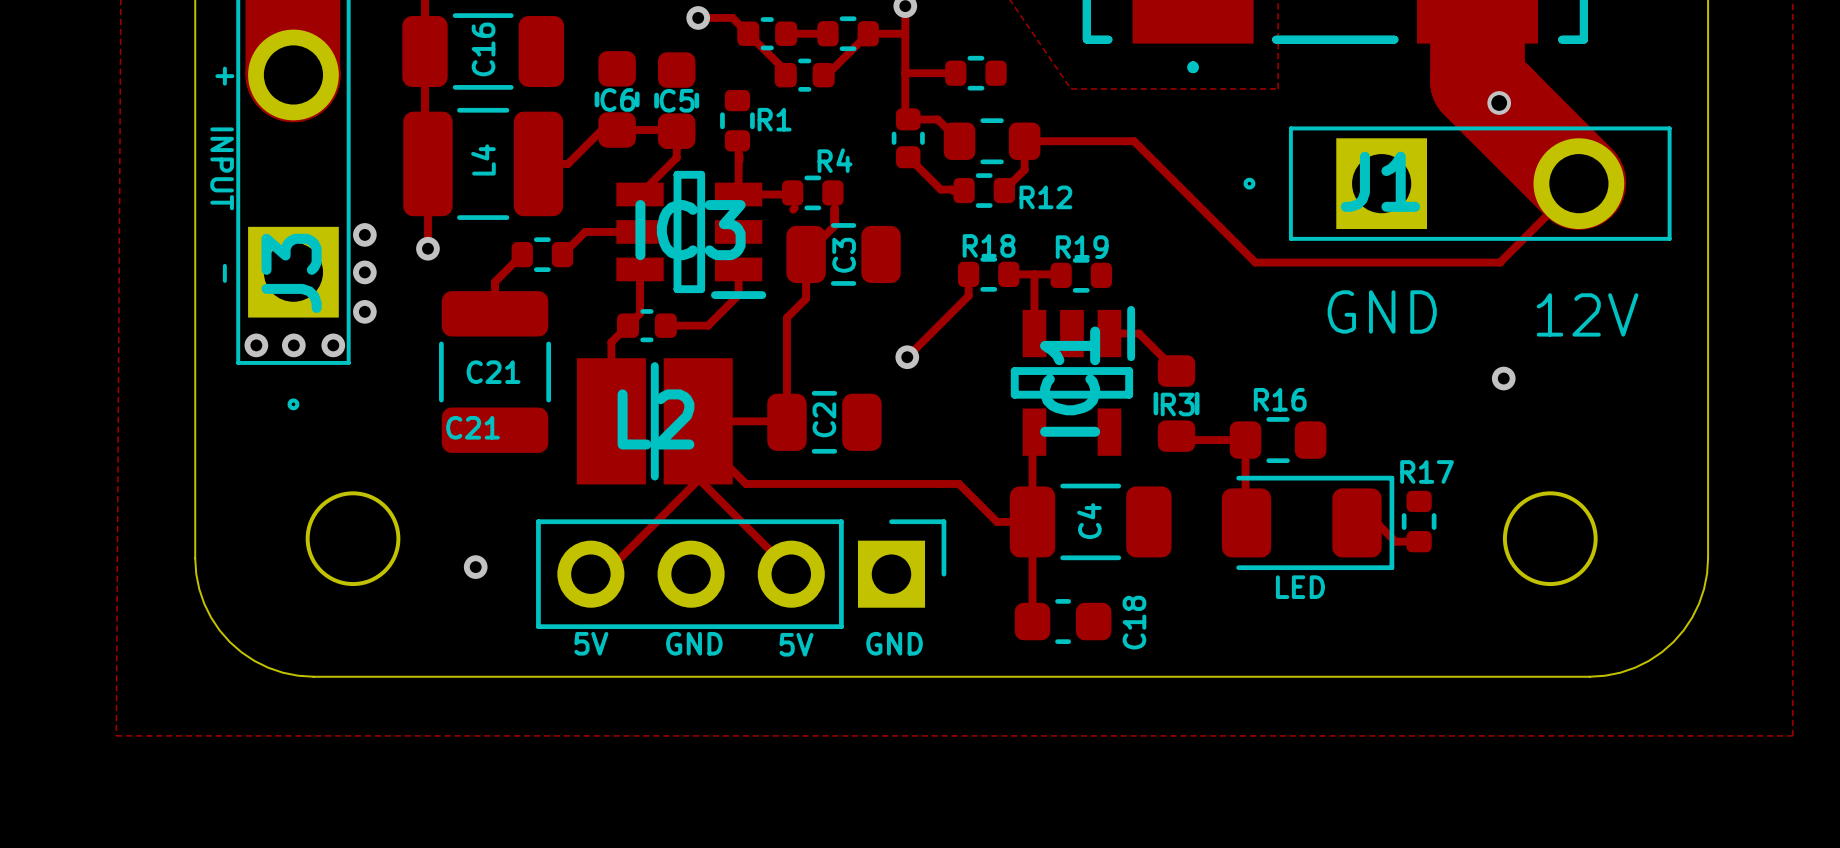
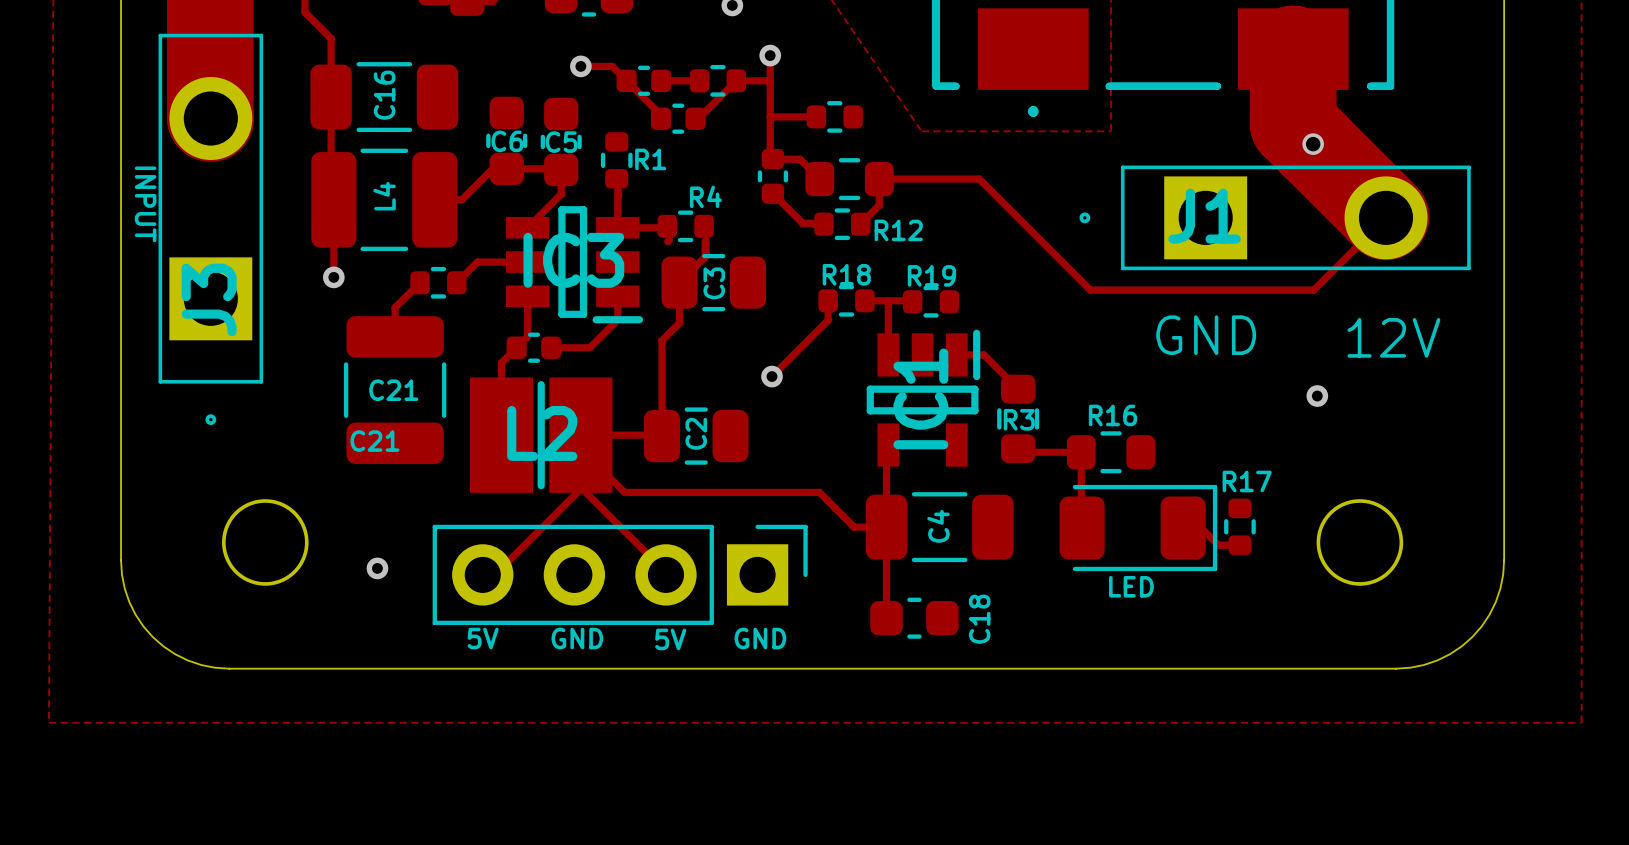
text: + (224, 76) -> none
via: (364, 234) -> none
via: (364, 272) -> none
text: - (224, 273) -> none
via: (364, 311) -> none
via: (256, 345) -> none
via: (293, 345) -> none
via: (333, 345) -> none

